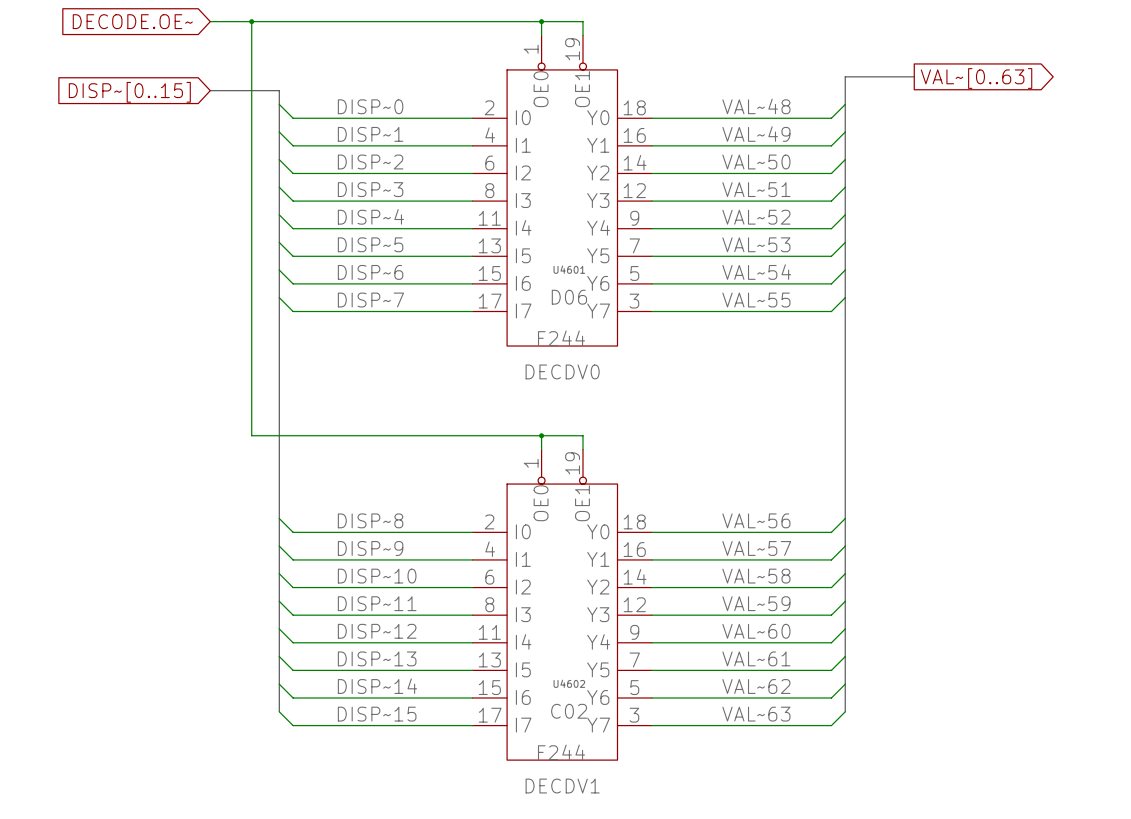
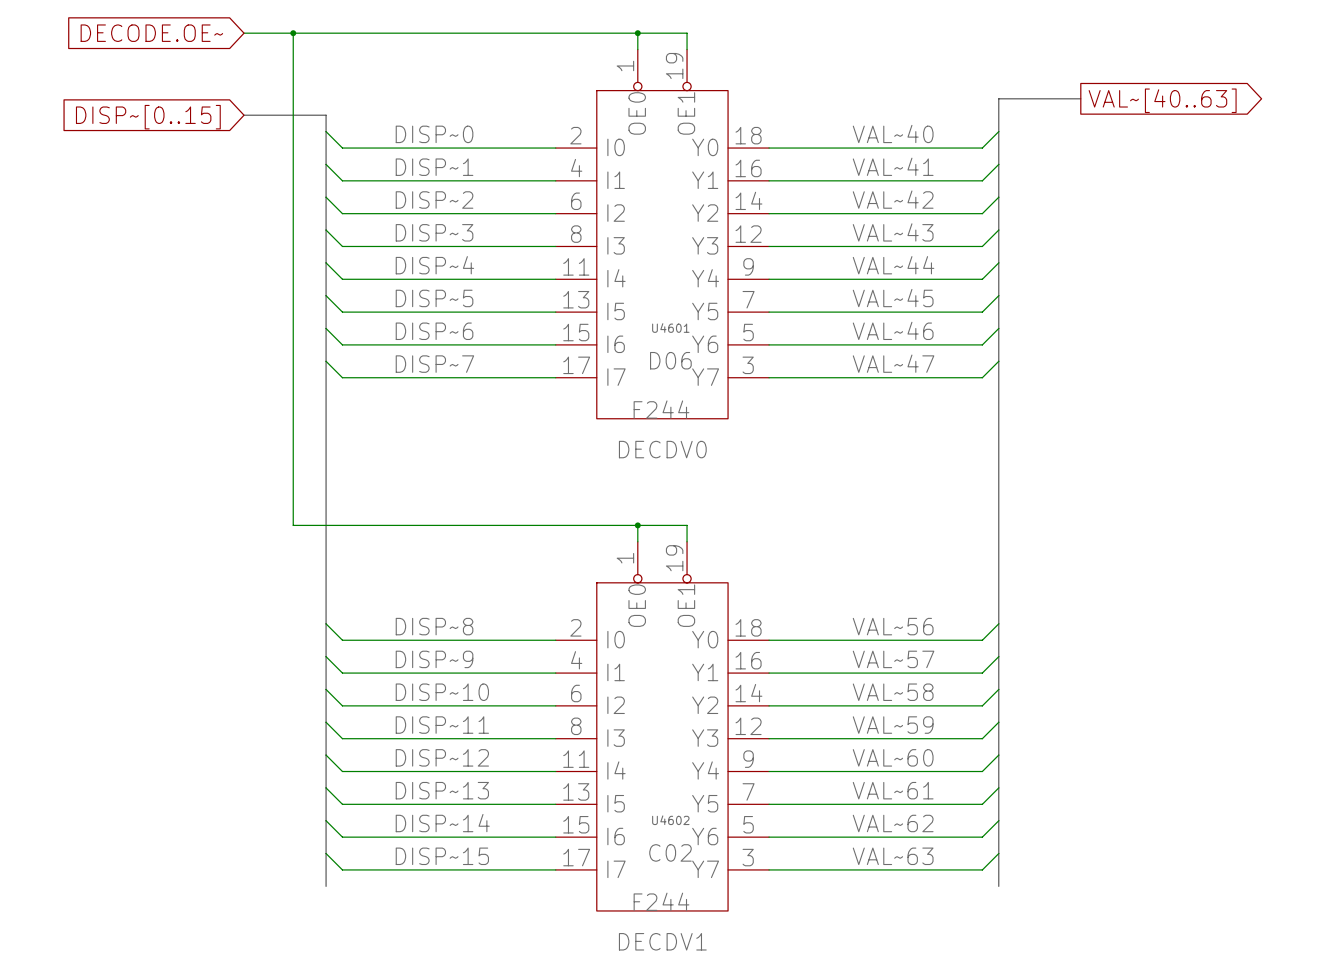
global label: VAL~[0..63] (976, 78) -> VAL~[40..63] (1162, 100)
label: VAL~48 (756, 106) -> VAL~40 (893, 133)
label: VAL~49 (756, 134) -> VAL~41 (893, 166)
label: VAL~50 (756, 161) -> VAL~42 (893, 199)
label: VAL~51 (756, 189) -> VAL~43 (893, 232)
label: VAL~52 (756, 217) -> VAL~44 (893, 265)
label: VAL~53 (756, 244) -> VAL~45 (893, 298)
label: VAL~54 (756, 272) -> VAL~46 (893, 330)
label: VAL~55 (756, 300) -> VAL~47 (893, 363)
bus: none -> (326, 853) (326, 886)
bus: none -> (998, 853) (998, 886)

